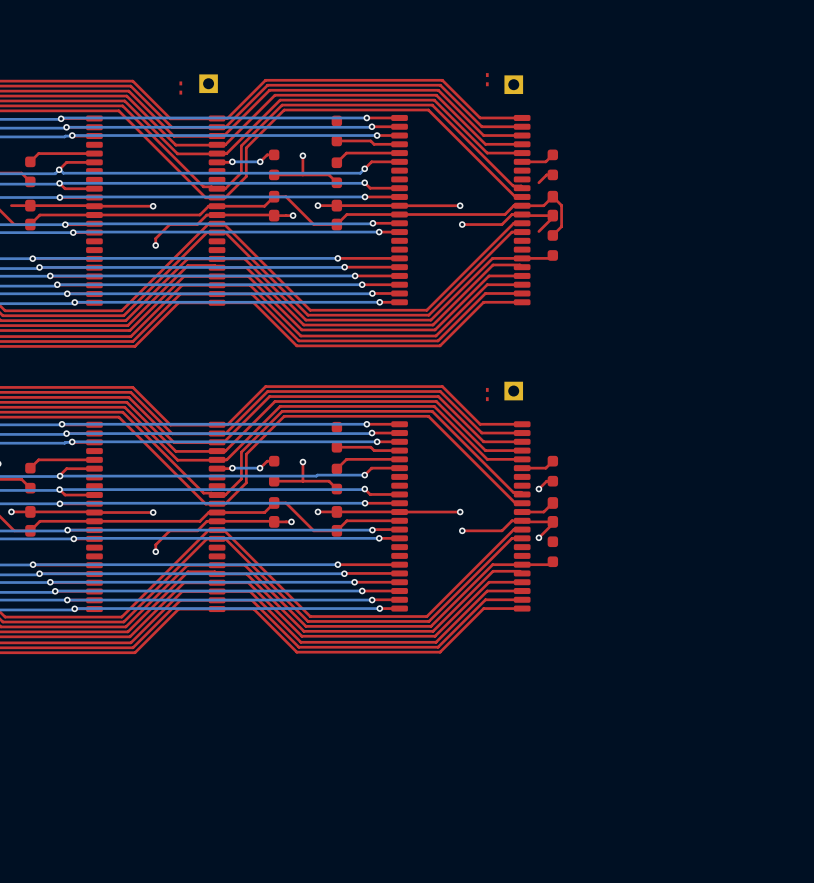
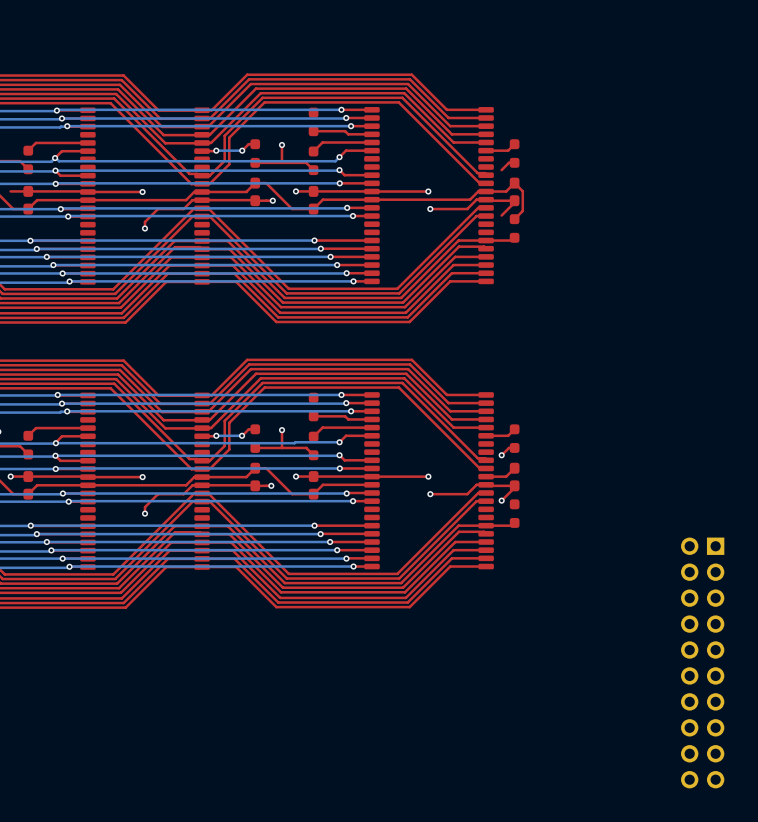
part: (487, 79) -> none
part: (208, 83) -> none
part: (513, 84) -> none
part: (180, 88) -> none
part: (513, 391) -> none
part: (487, 394) -> none
part: none -> (702, 662)

